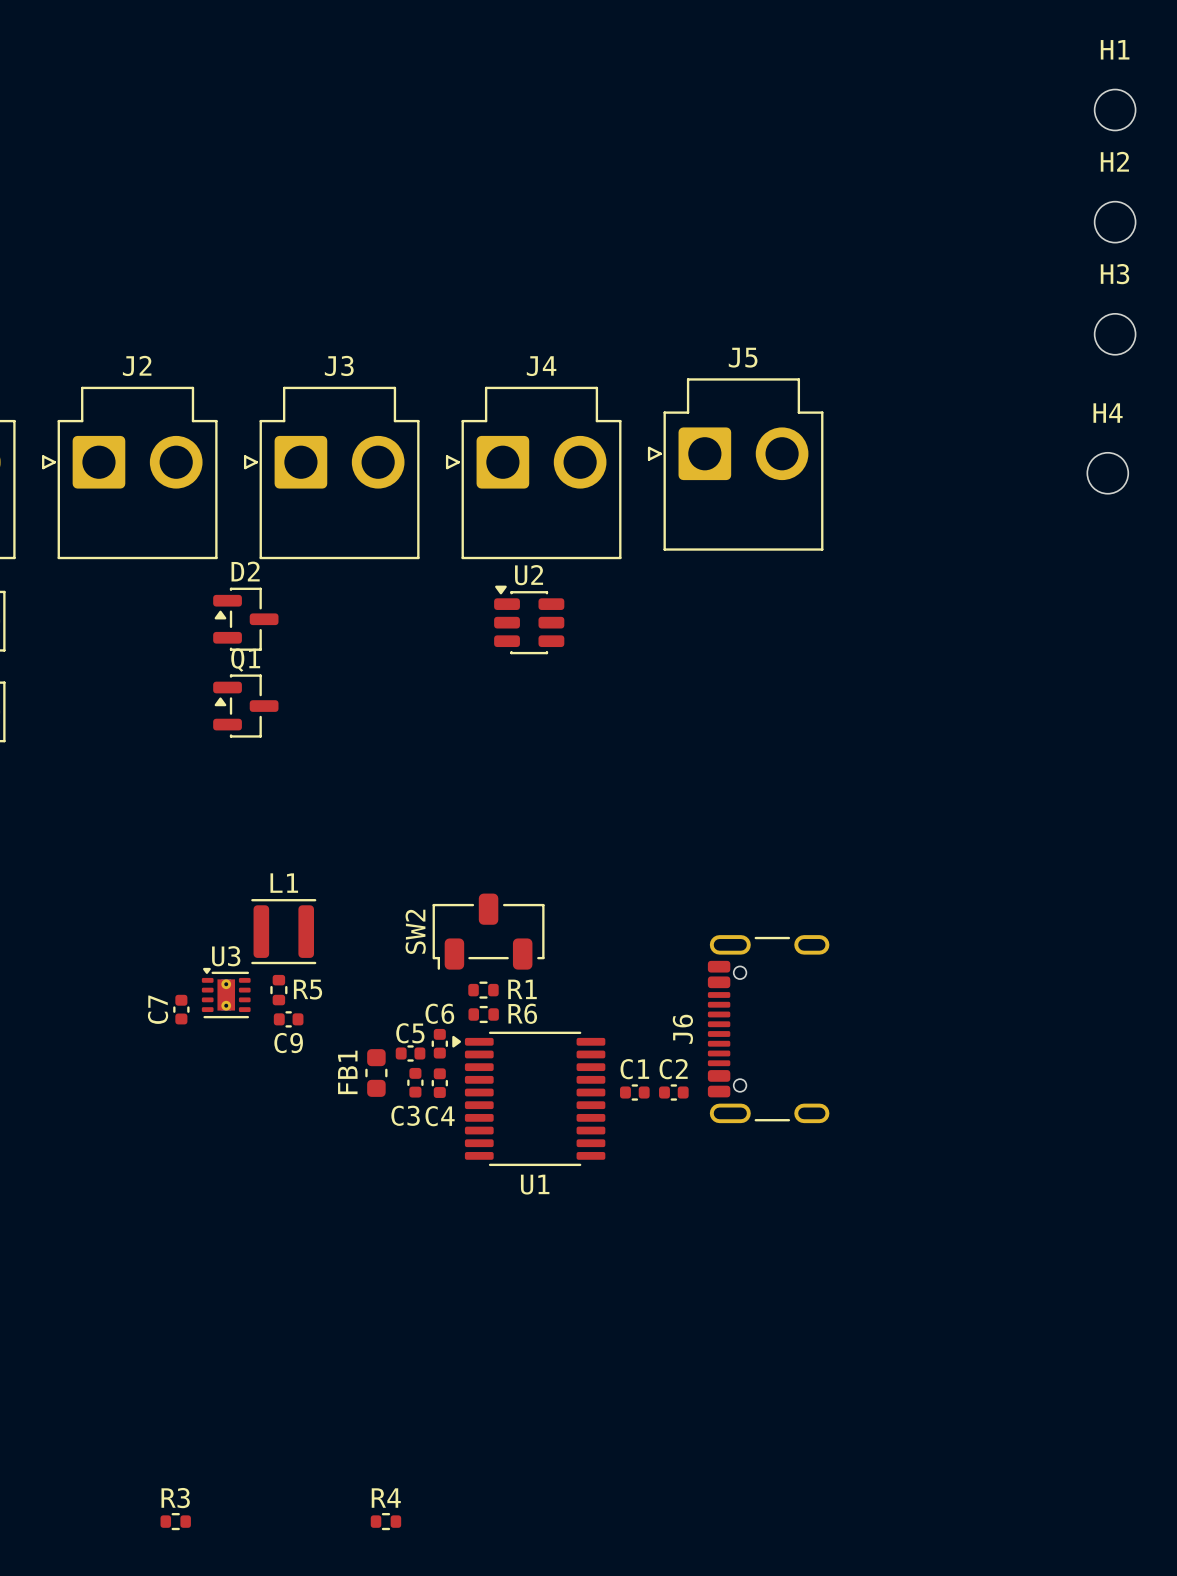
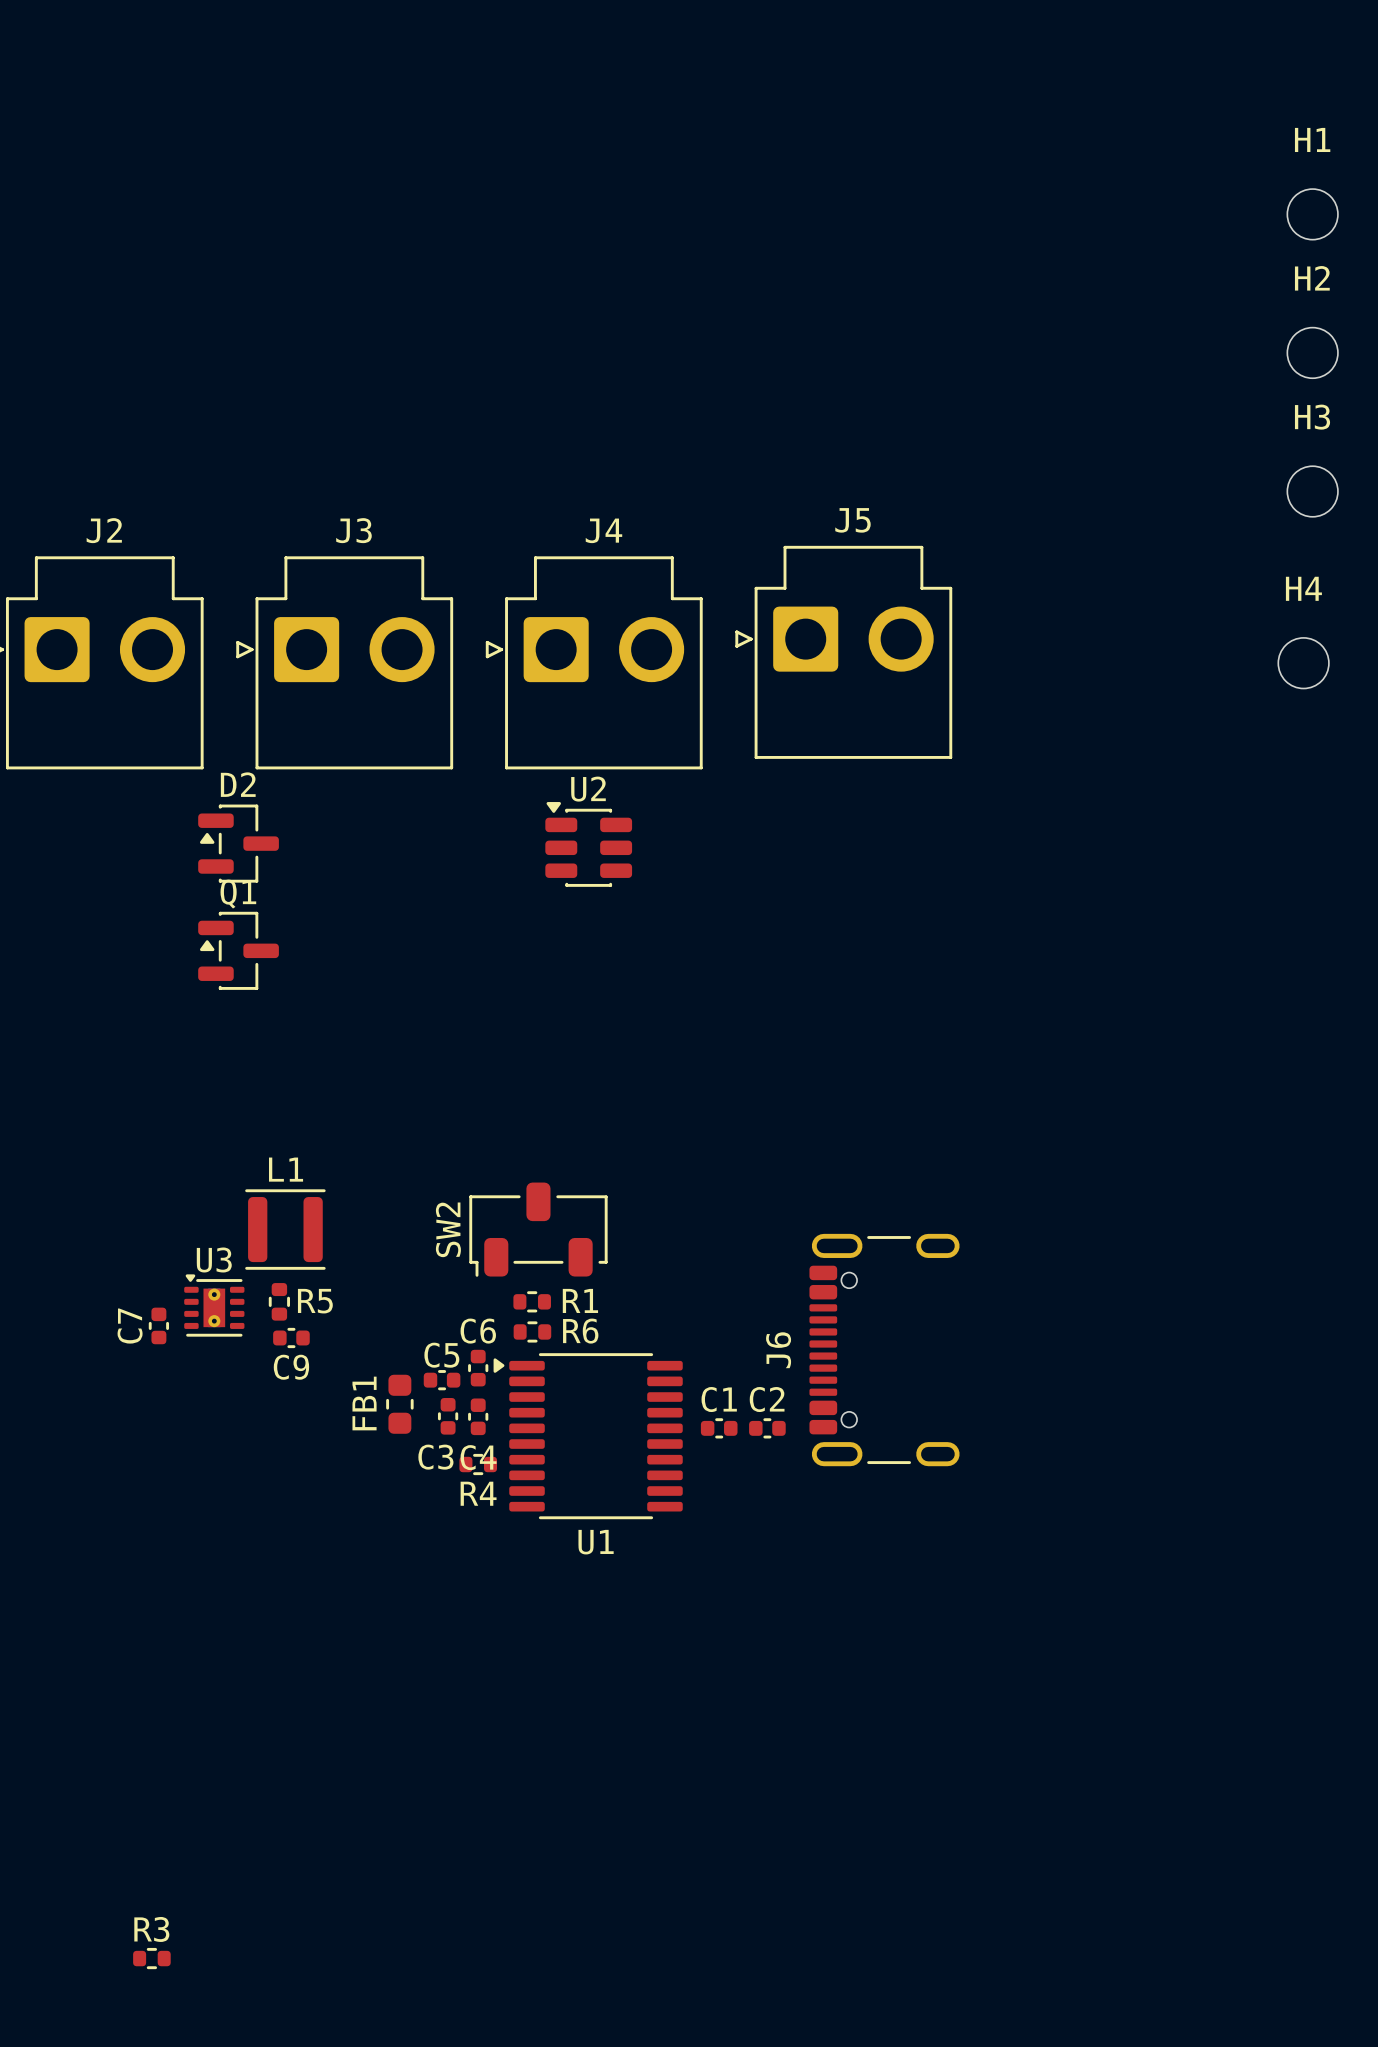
R4 name position: R4 (386, 1498) -> R4 (478, 1493)
R4 position: (385, 1521) -> (478, 1464)

